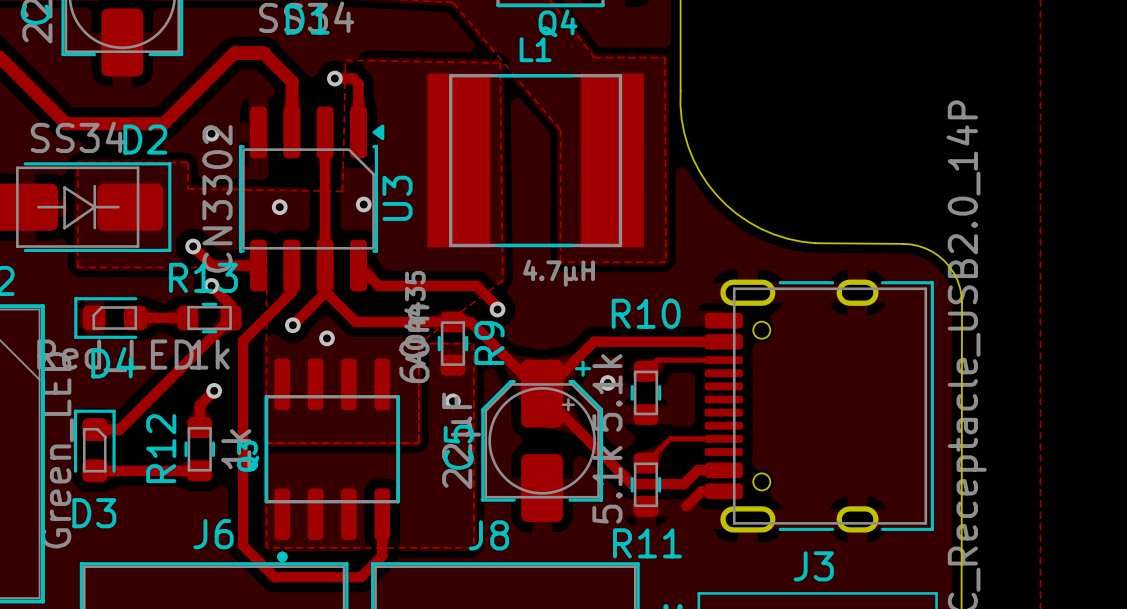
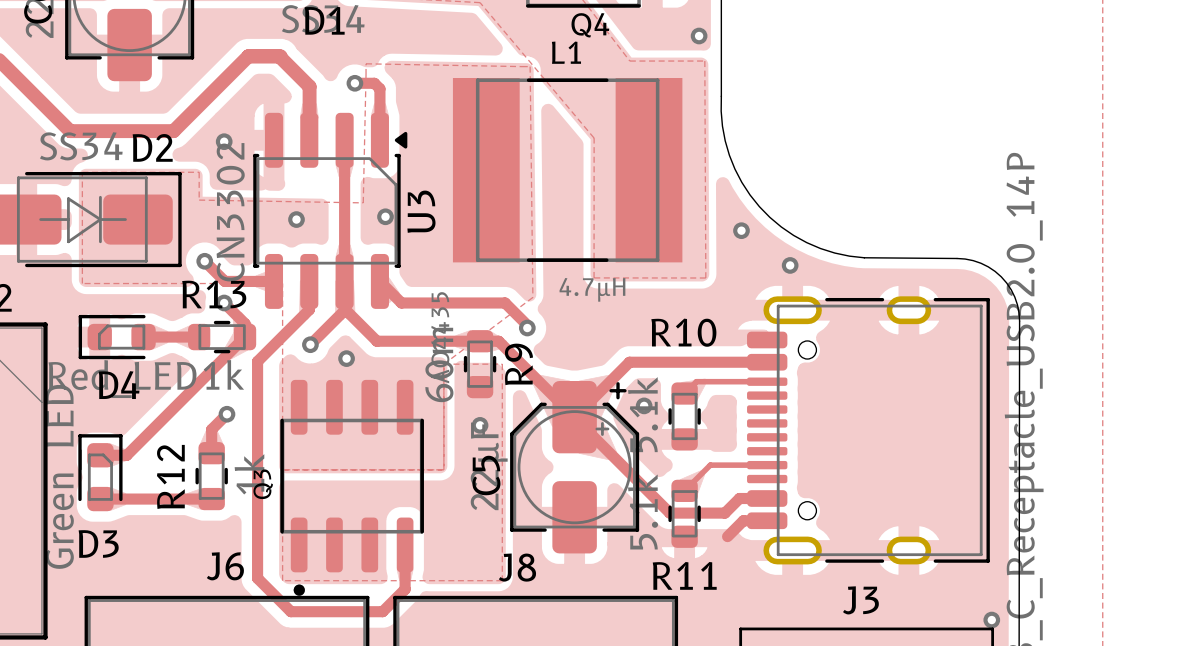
via: none -> (699, 36)
via: none -> (741, 230)
via: none -> (790, 265)
via: none -> (991, 620)

